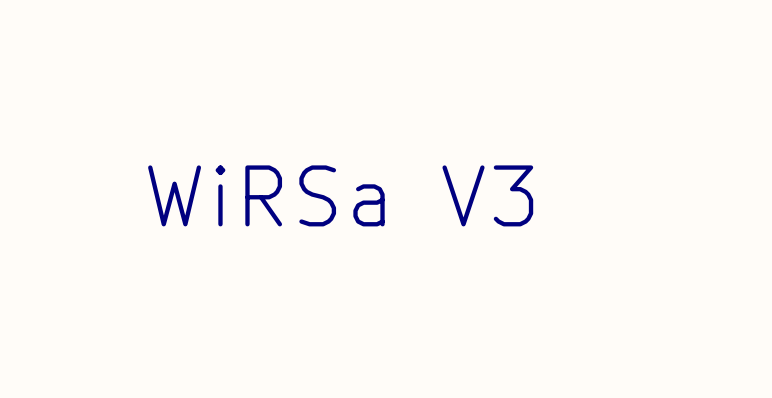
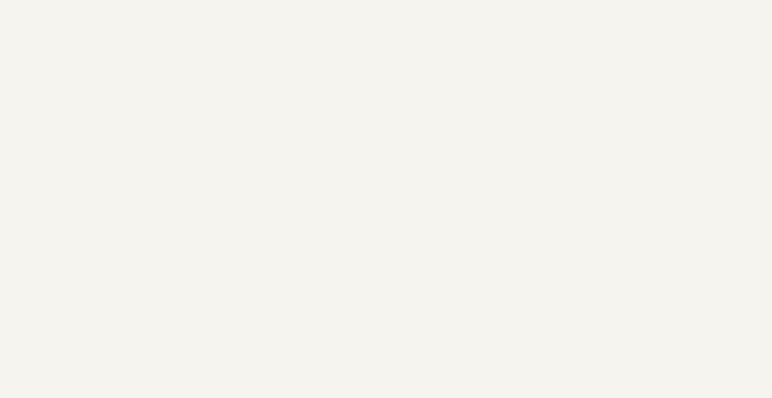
text: WiRSa V3 (340, 195) -> none

